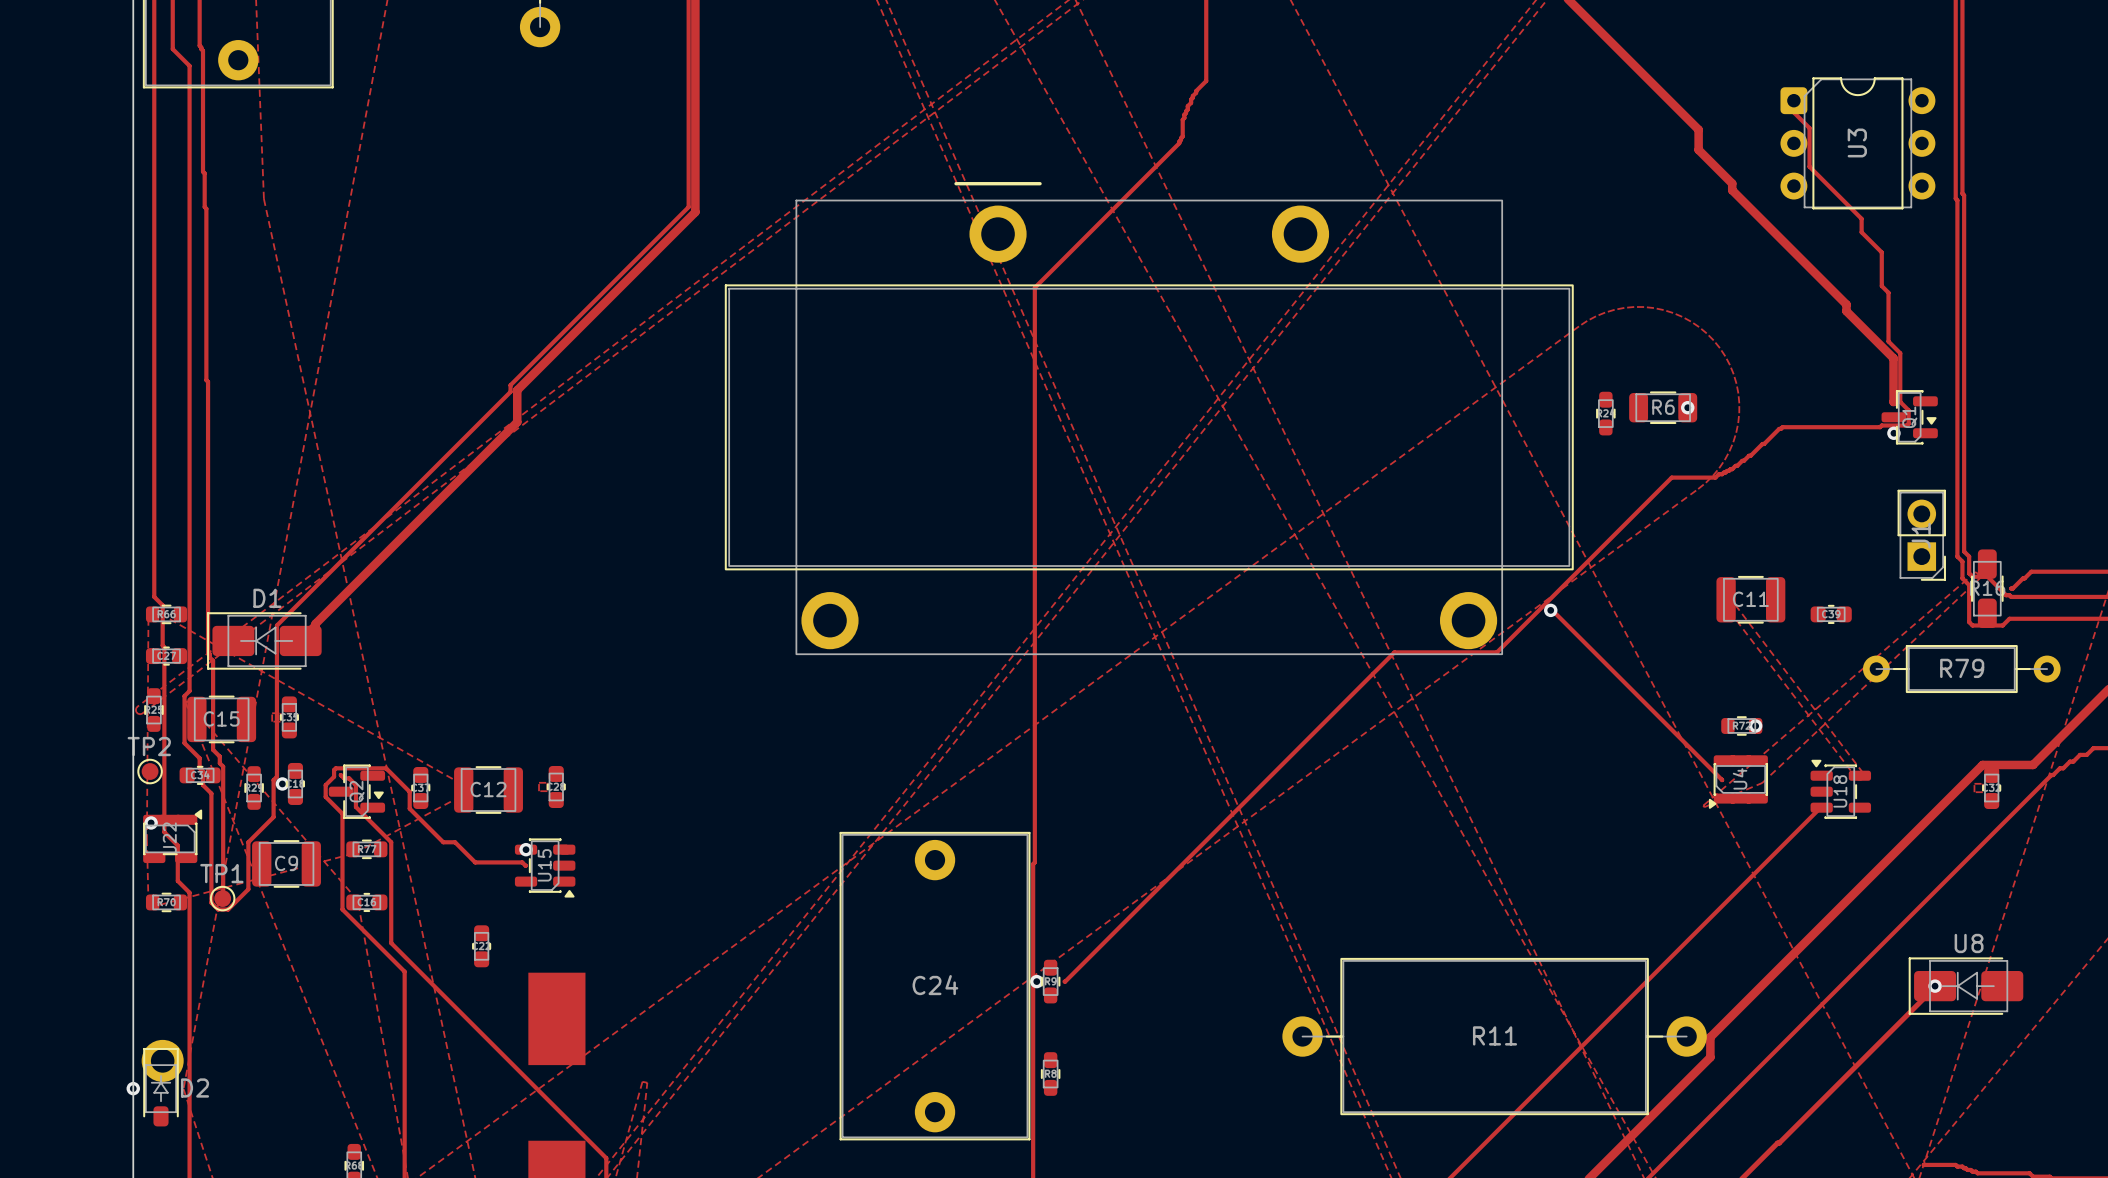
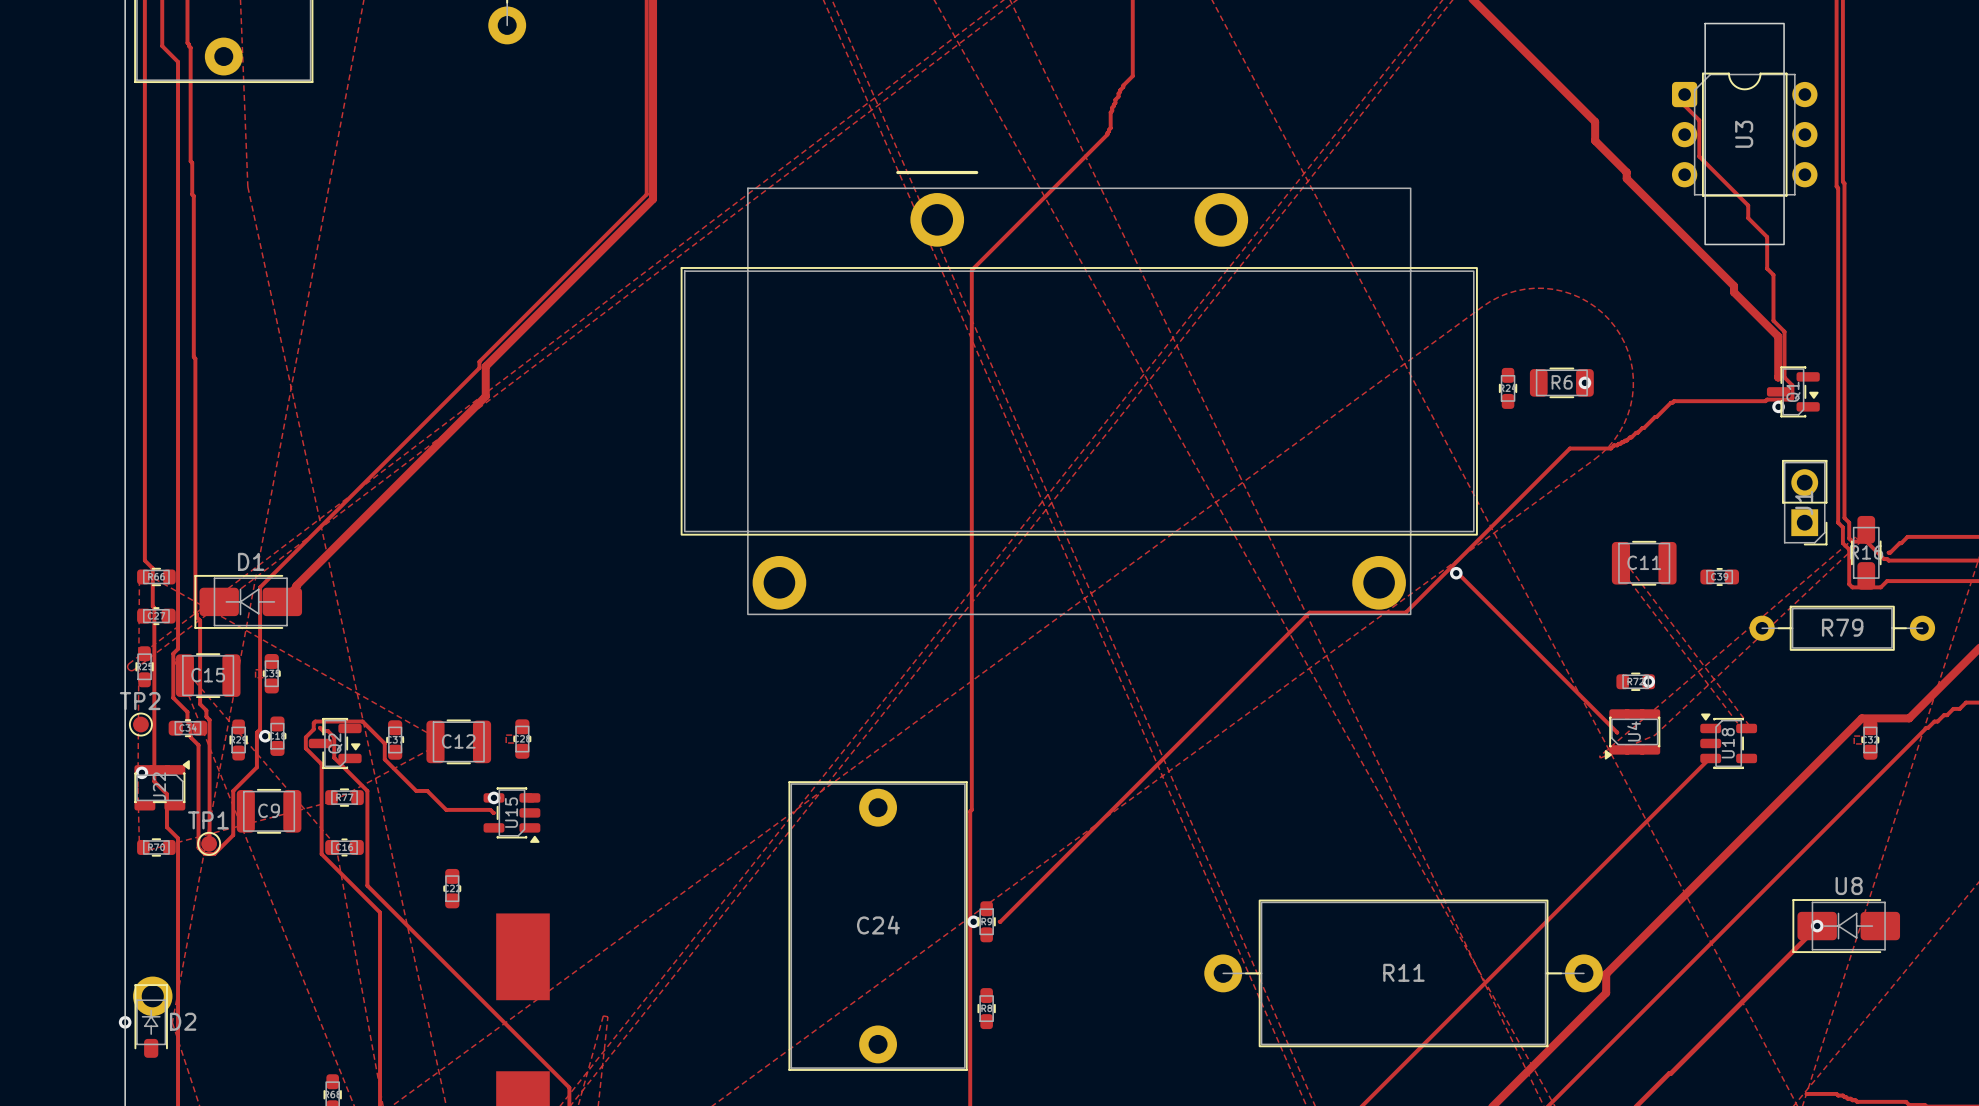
U3 footprint: [1780, 77, 1936, 210] -> [1672, 22, 1818, 246]

